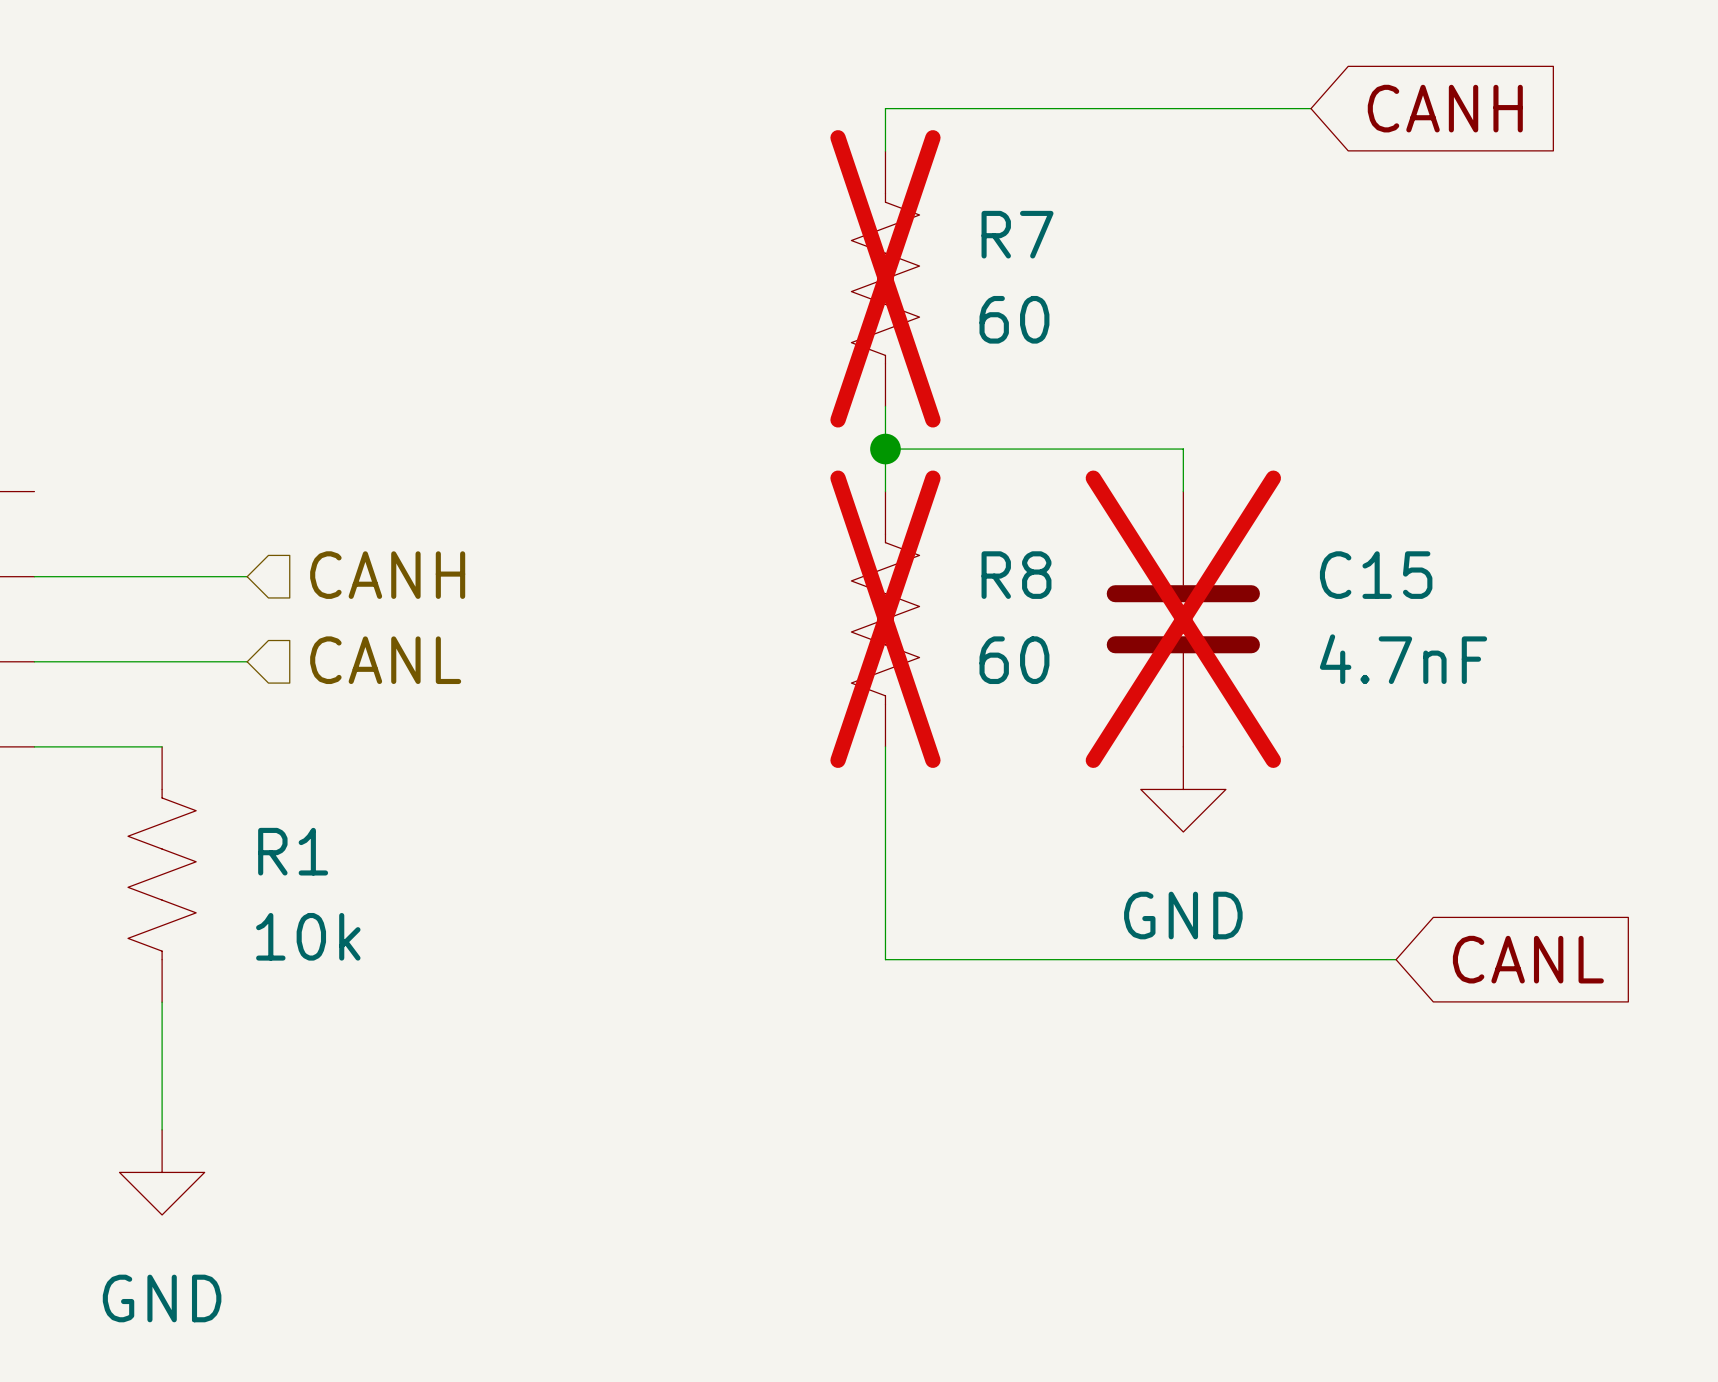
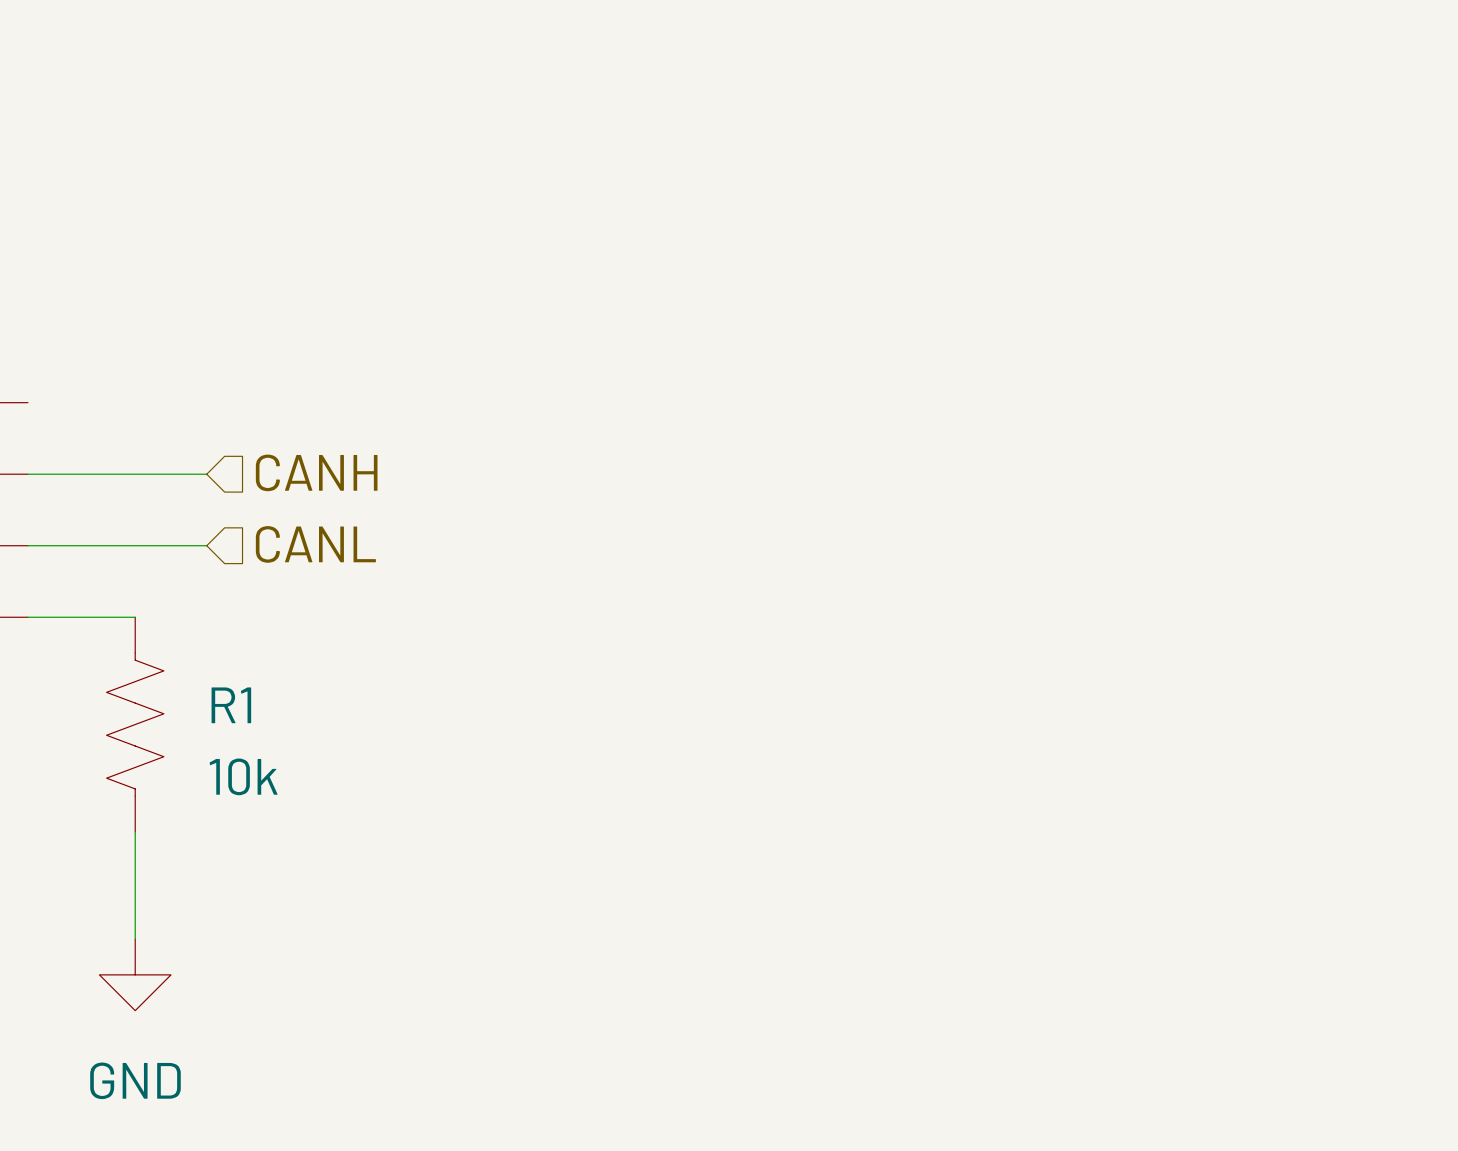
wire: (1310, 108) (885, 108) (885, 151) -> none
global label: CANH (1445, 108) -> none
R7: 60 (885, 278) -> none
wire: (885, 406) (885, 491) -> none
wire: (885, 449) (1183, 449) (1183, 491) -> none
junction: (885, 449) -> none
R8: 60 (885, 619) -> none
C15: 4.7nF (1183, 619) -> none
wire: (885, 746) (885, 959) (1396, 959) -> none
power symbol: GND (1183, 789) -> none
global label: CANL (1528, 959) -> none

